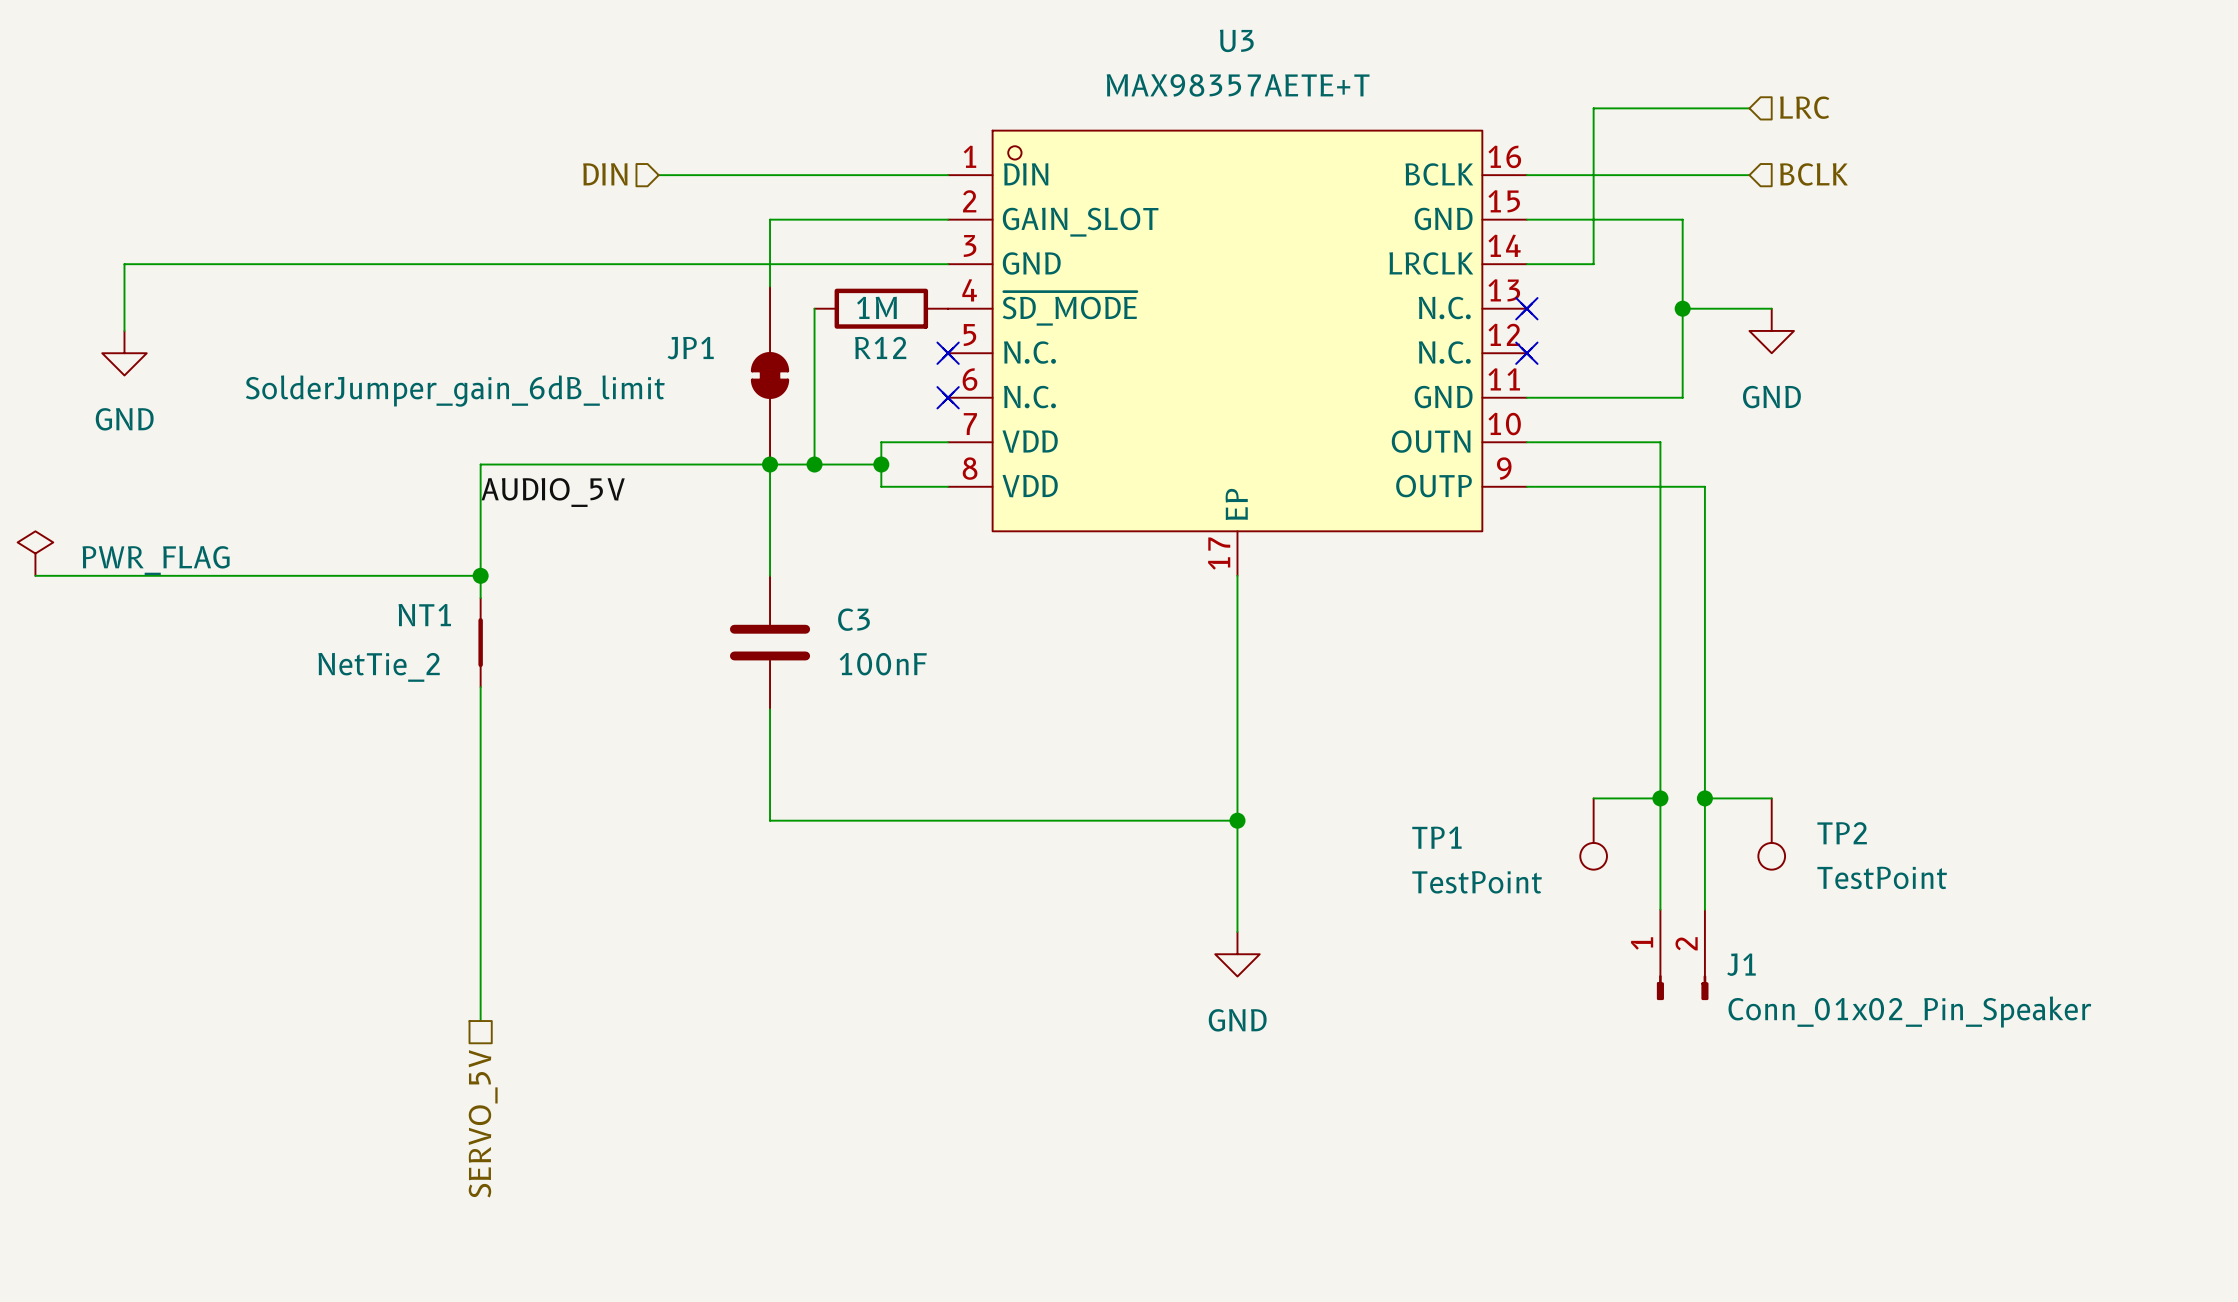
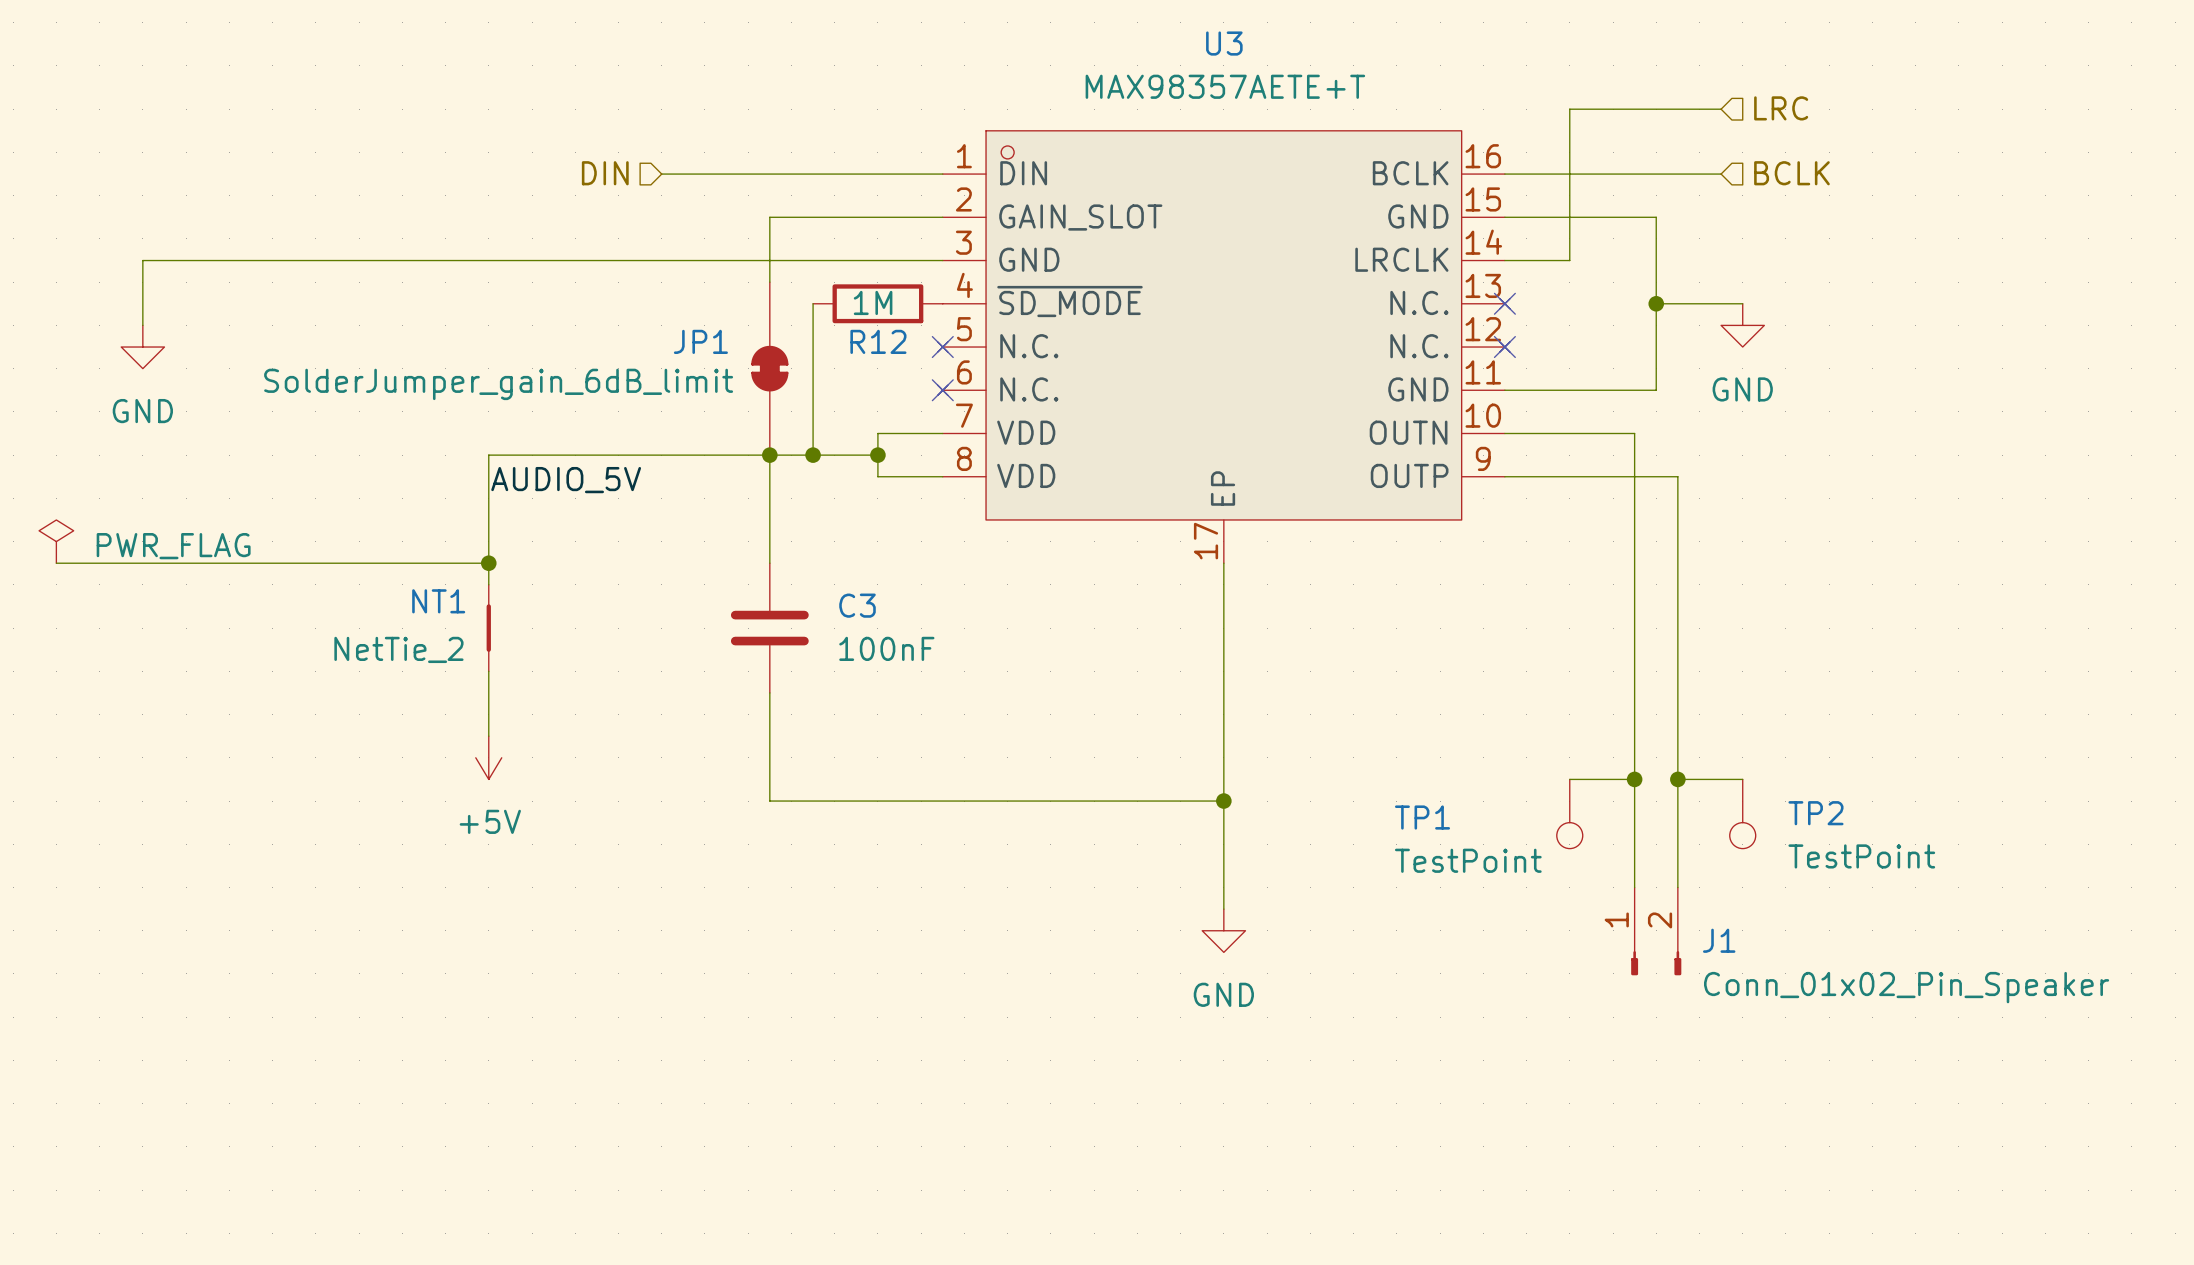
wire: (480, 753) (480, 1021) -> none
power symbol: none -> +5V (488, 757)
hierarchical label: SERVO_5V (483, 1123) -> none

